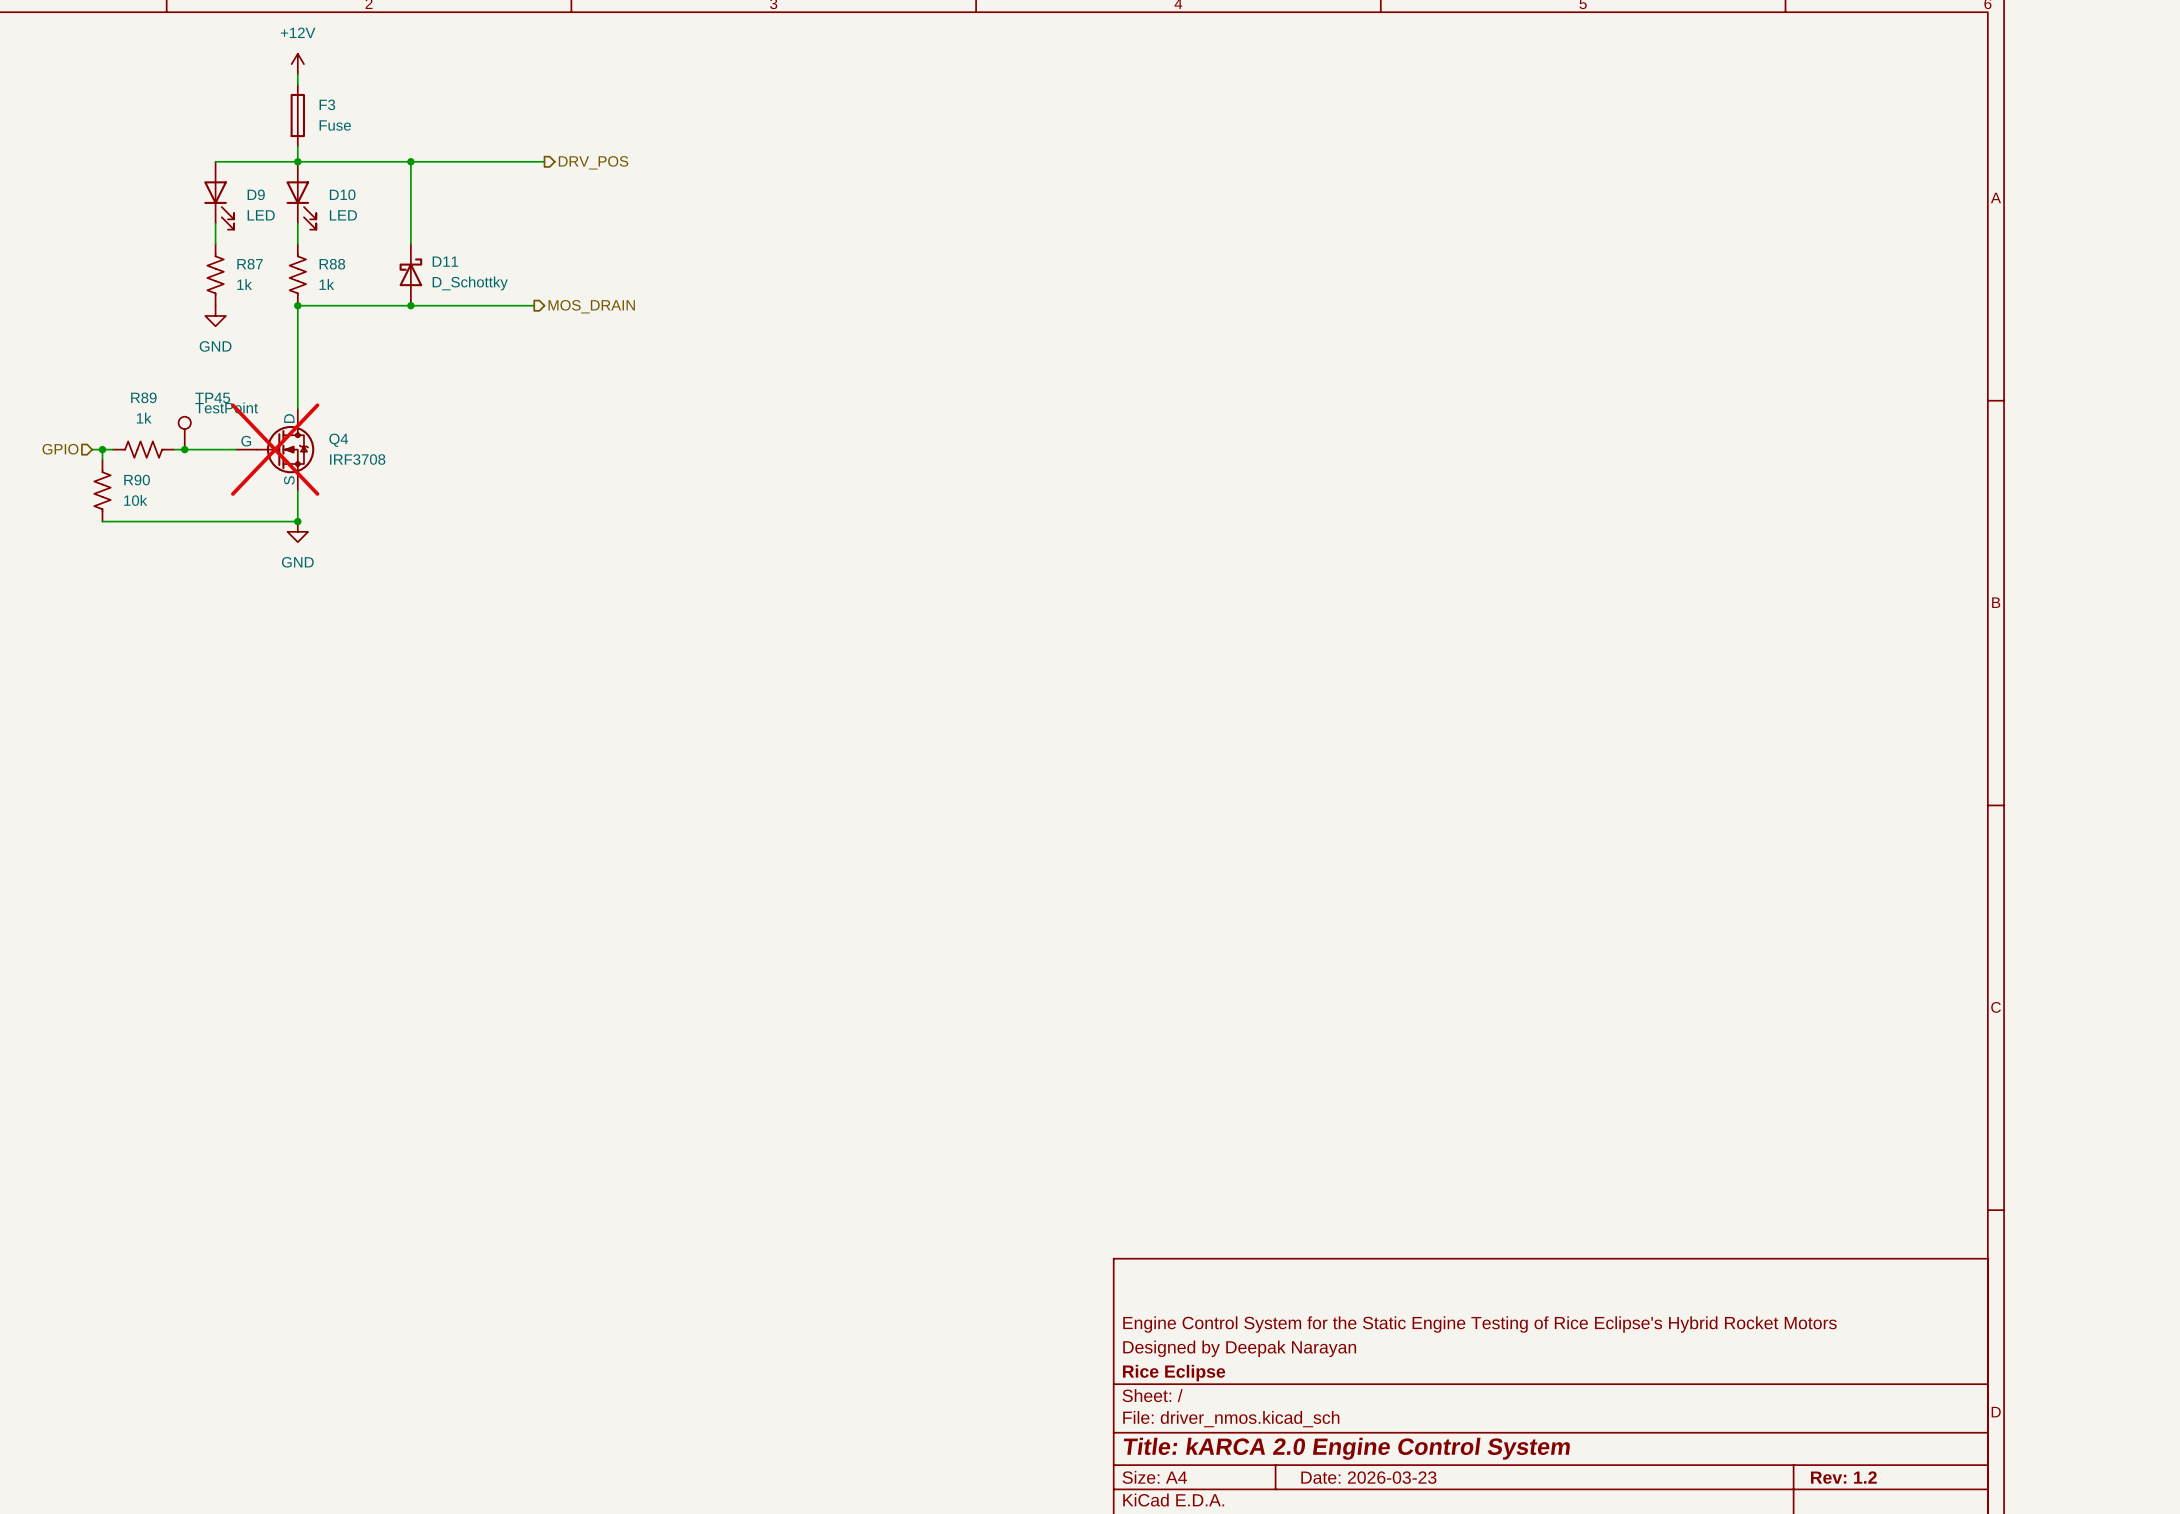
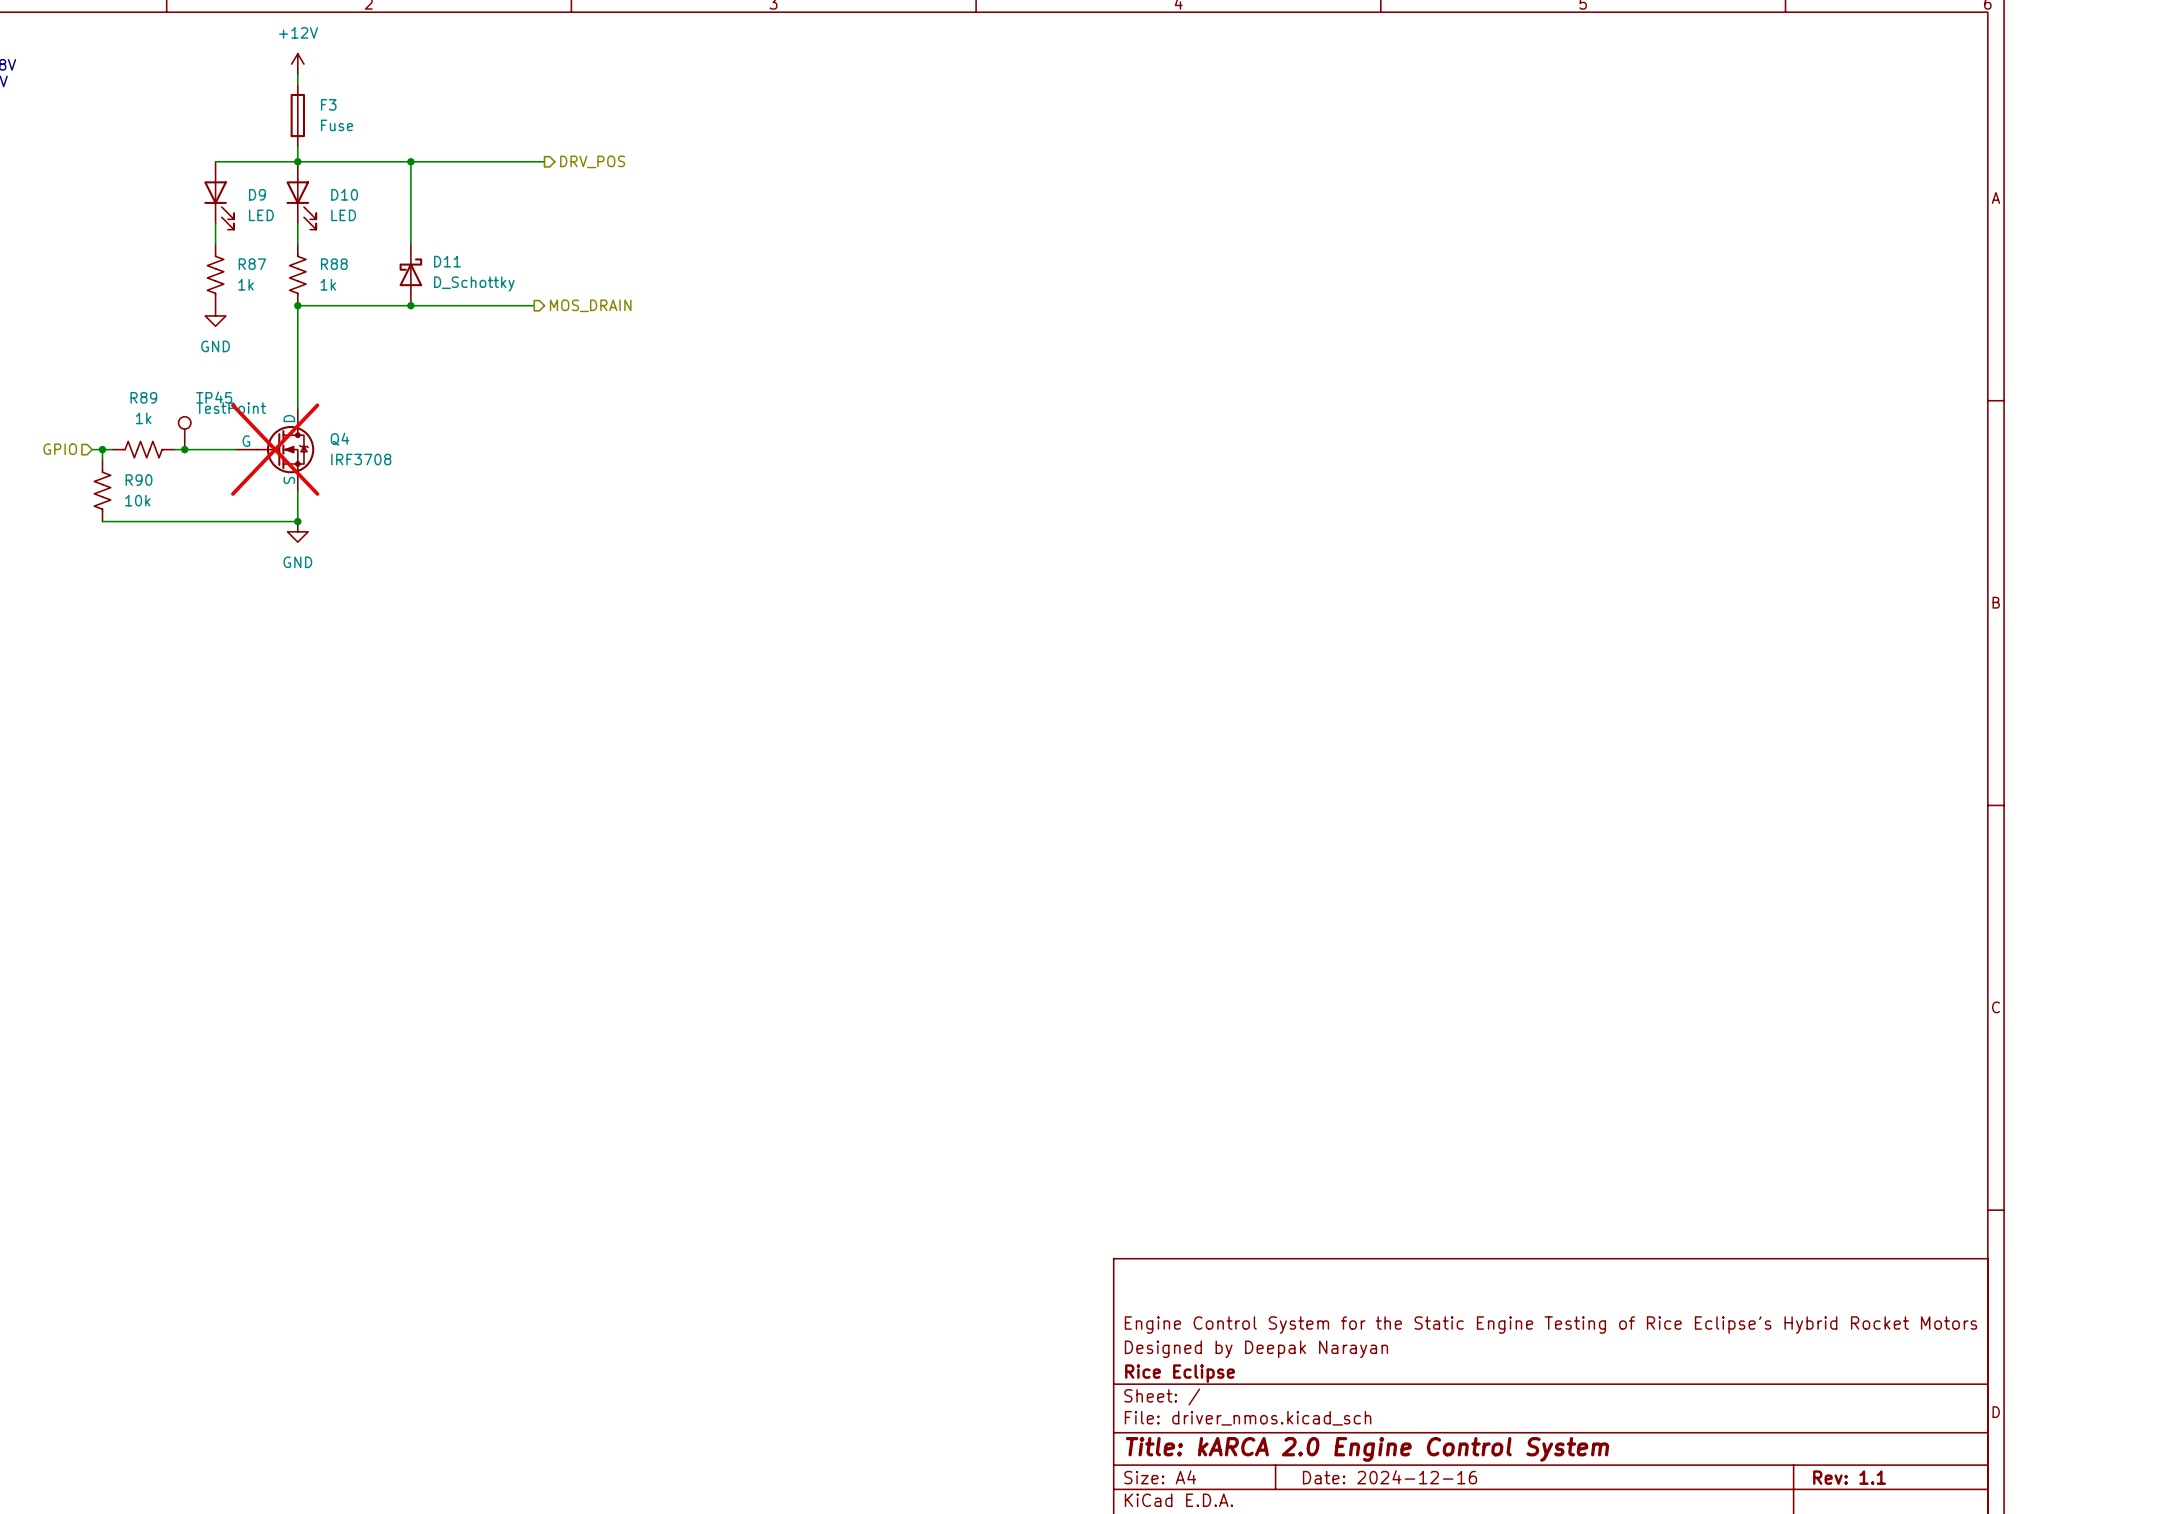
title block: Date: 2026-03-23 (1368, 1477) -> Date: 2024-12-16 (1390, 1477)
title block: Rev: 1.2 (1843, 1477) -> Rev: 1.1 (1849, 1477)

